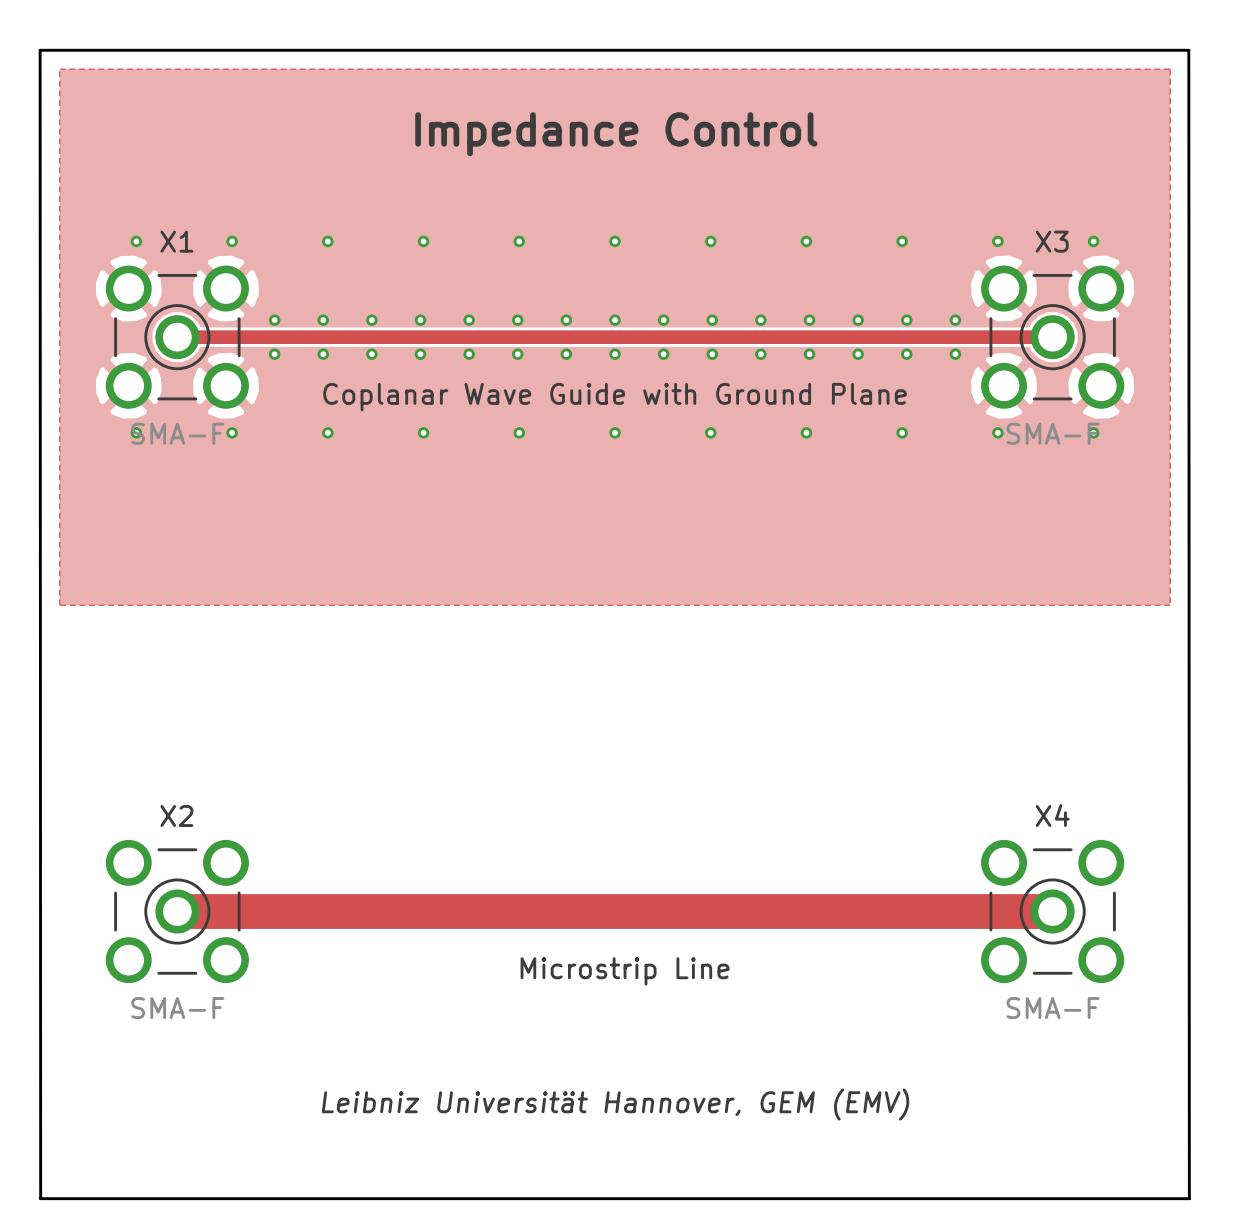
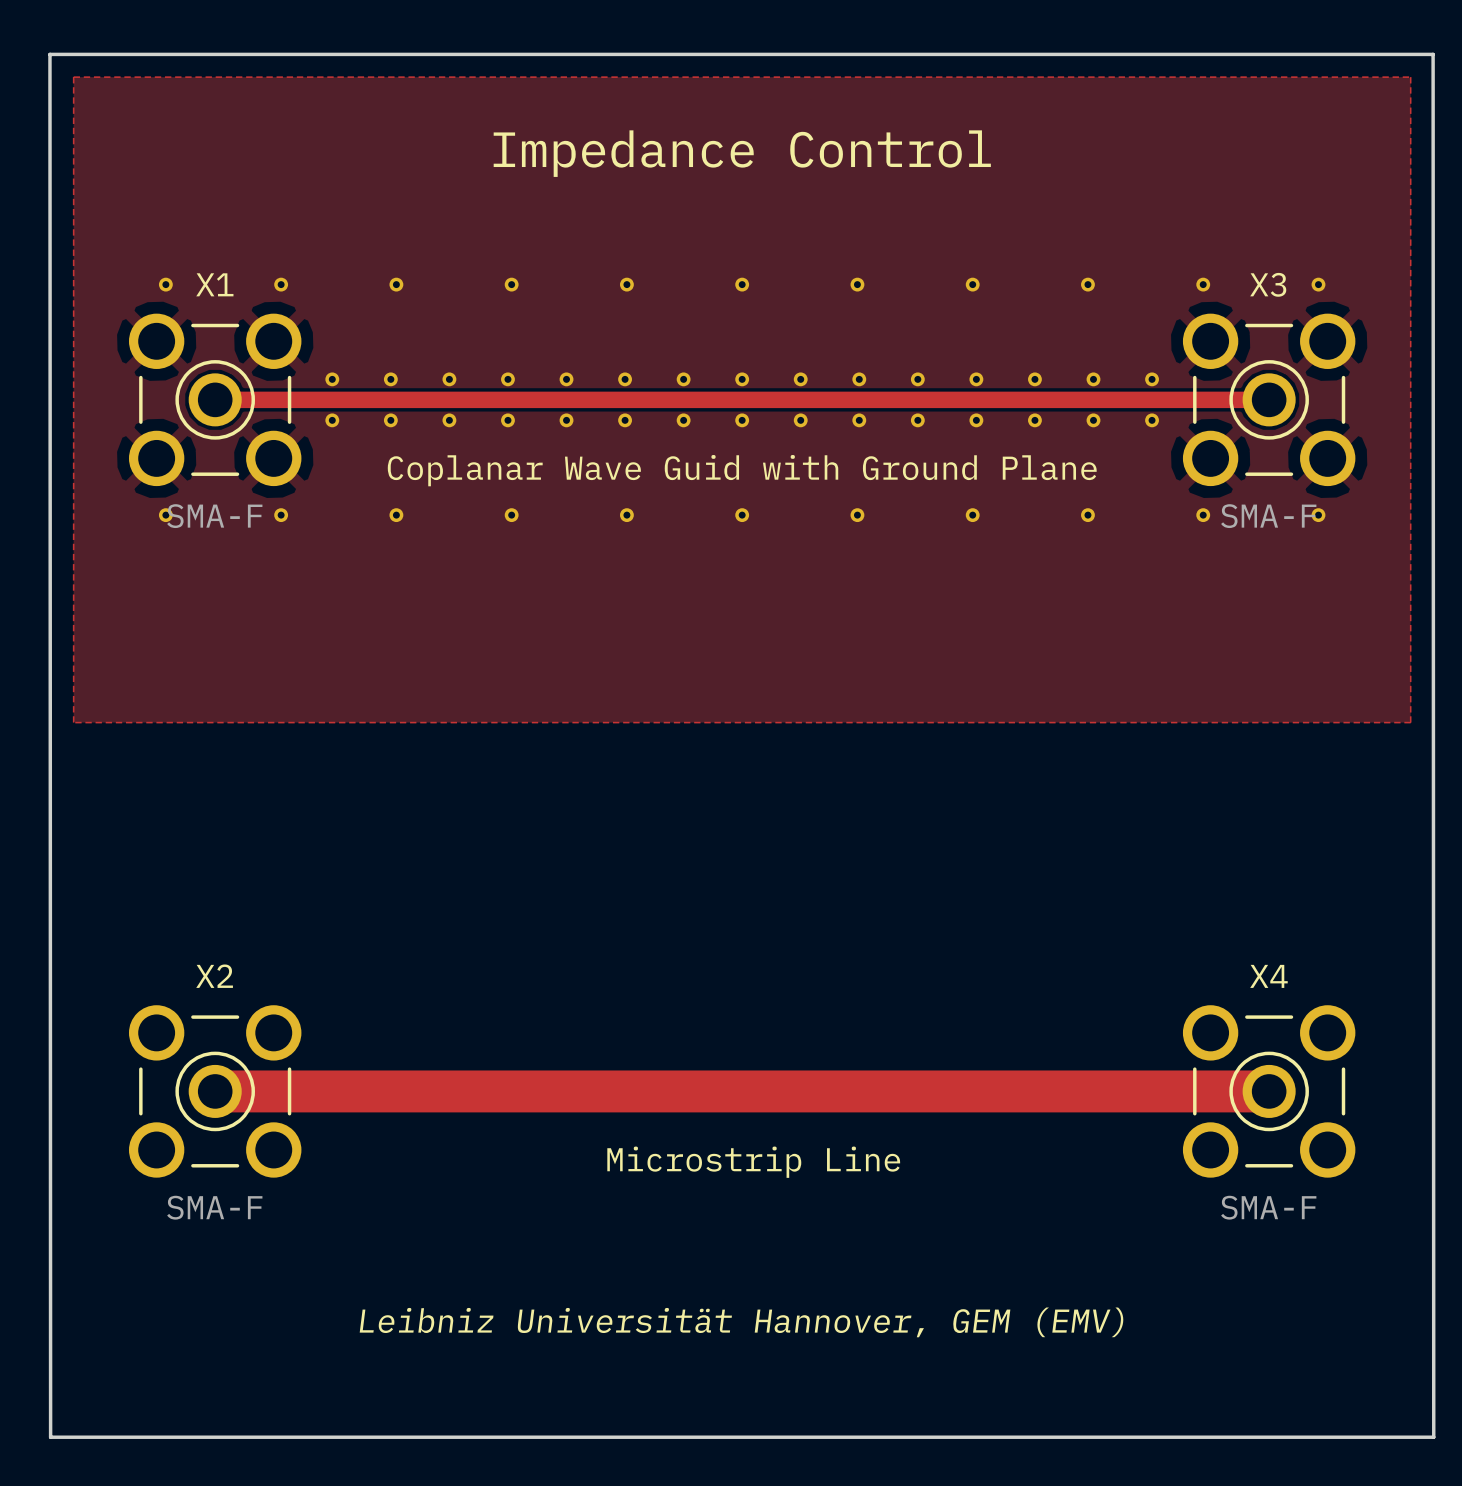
text: Coplanar Wave Guide with Ground Plane (615, 397) -> Coplanar Wave Guid with Ground Plane (742, 470)

